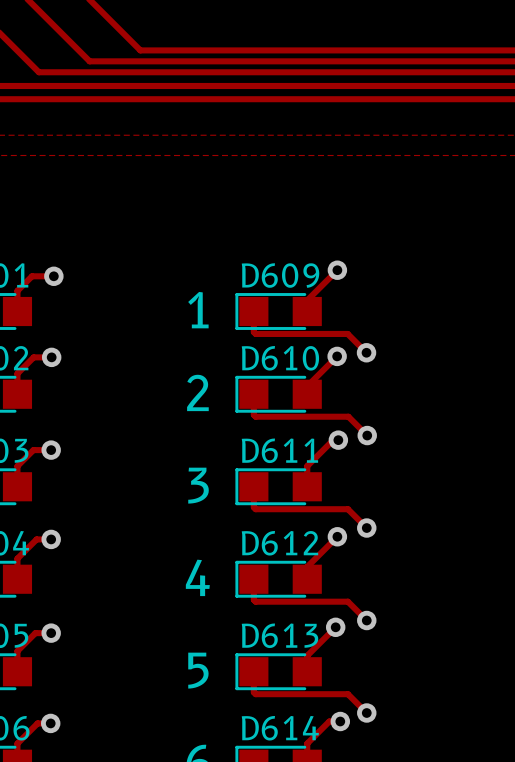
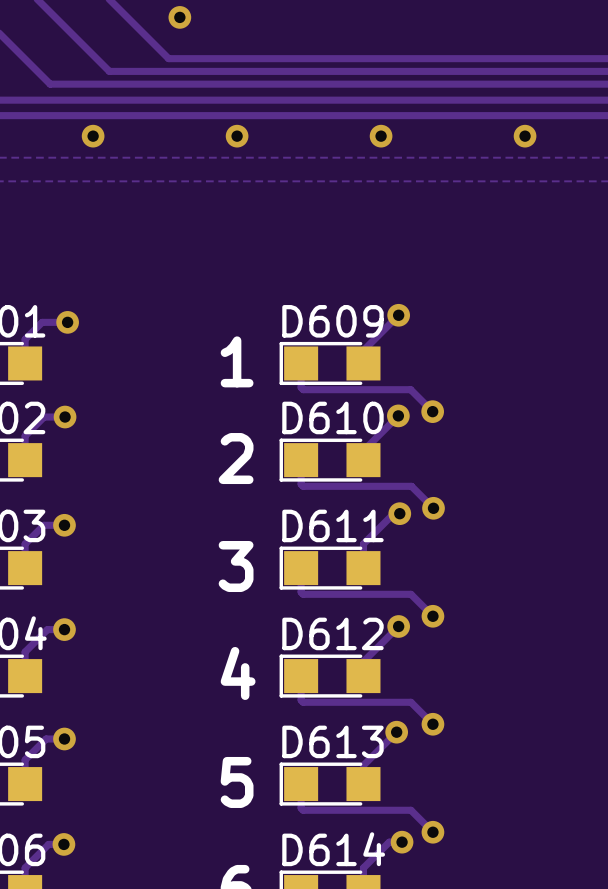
via: none -> (179, 17)
via: none -> (93, 136)
via: none -> (237, 136)
via: none -> (381, 136)
via: none -> (525, 136)

